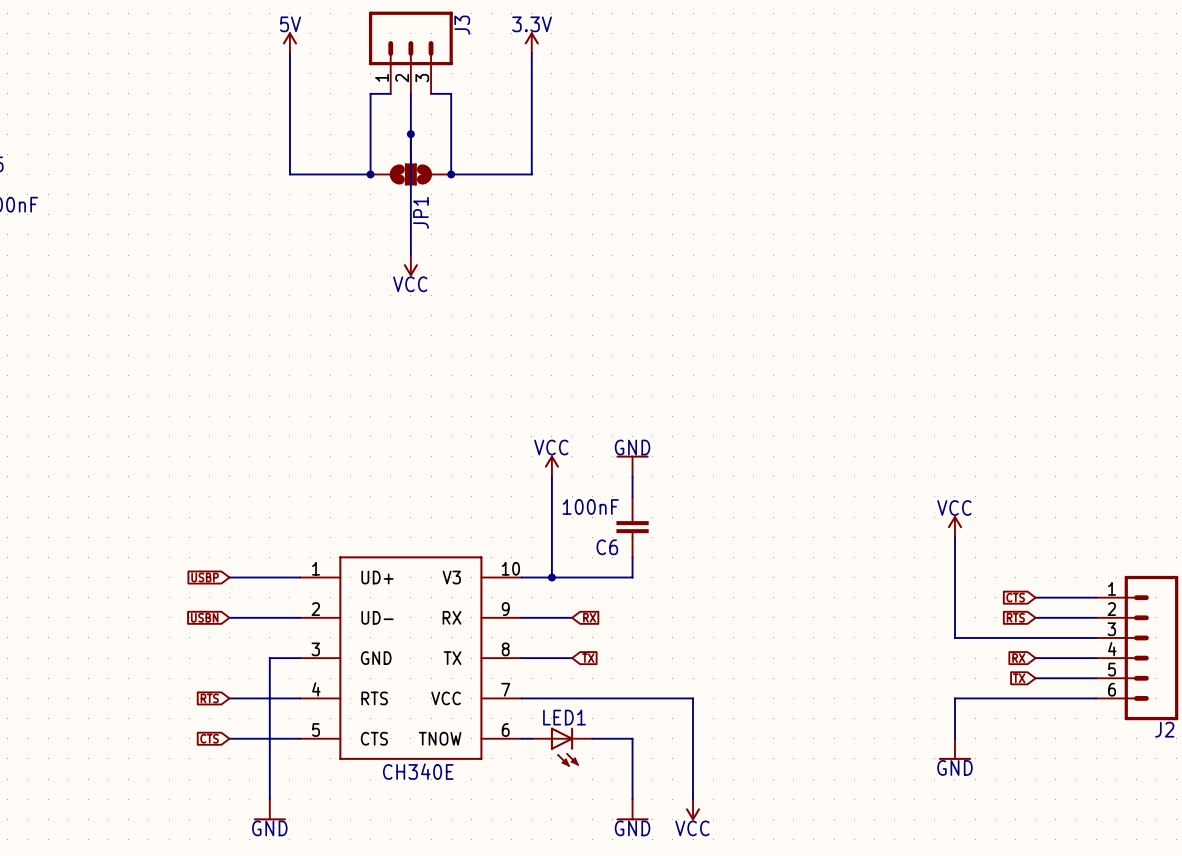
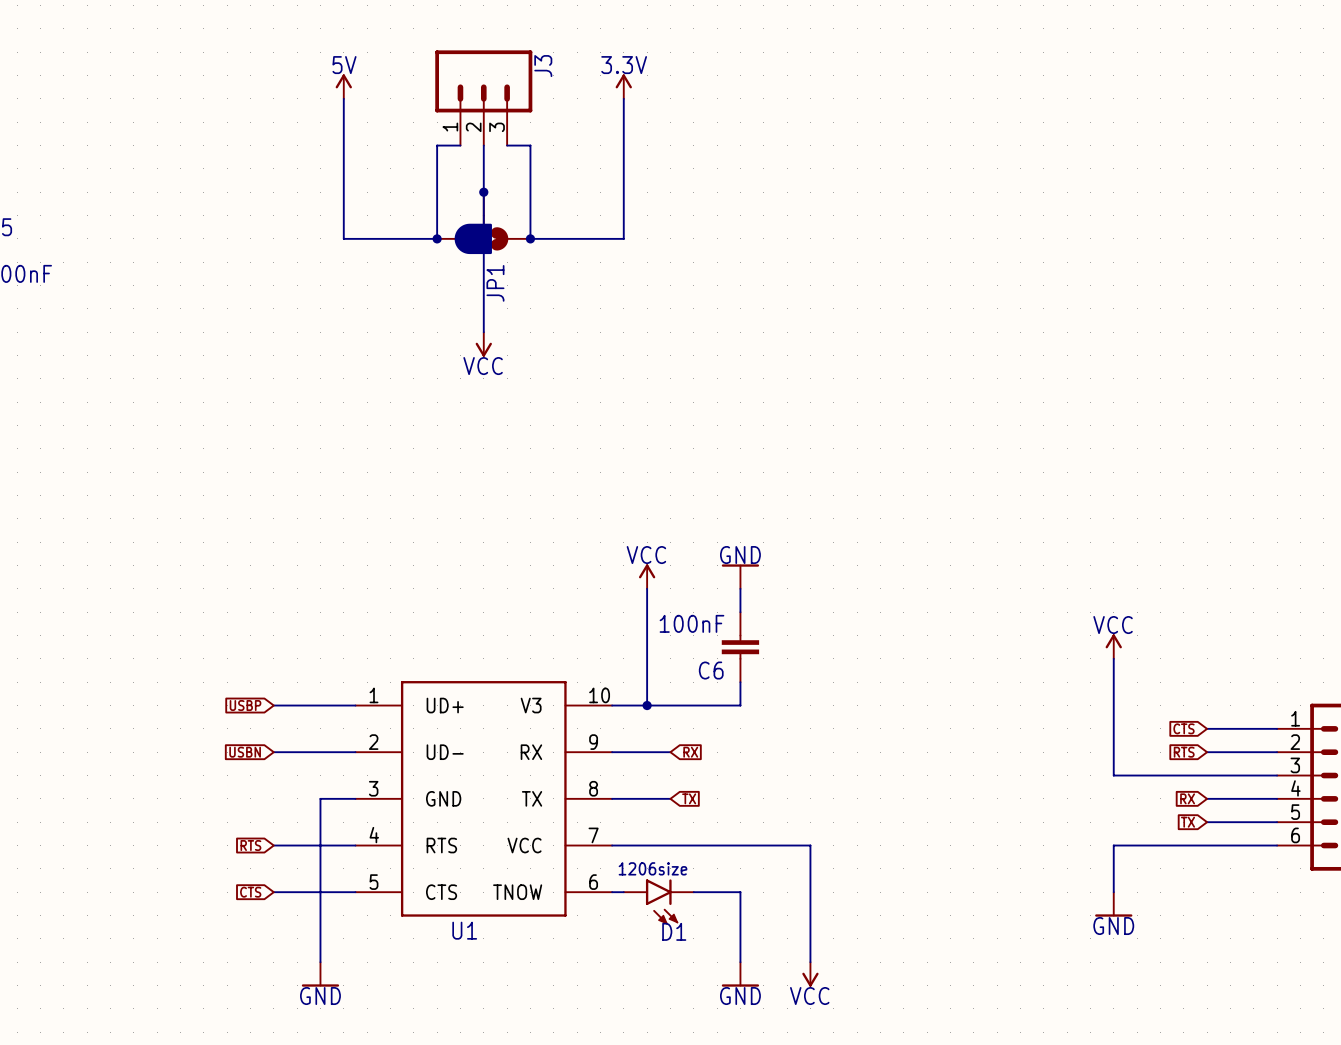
JP1 symbol: [370, 134, 452, 186] -> [437, 192, 531, 255]
LED1: (562, 747) -> none
D1: none -> 1206size (658, 901)
CH340E name: CH340E (418, 771) -> U1 (464, 930)

